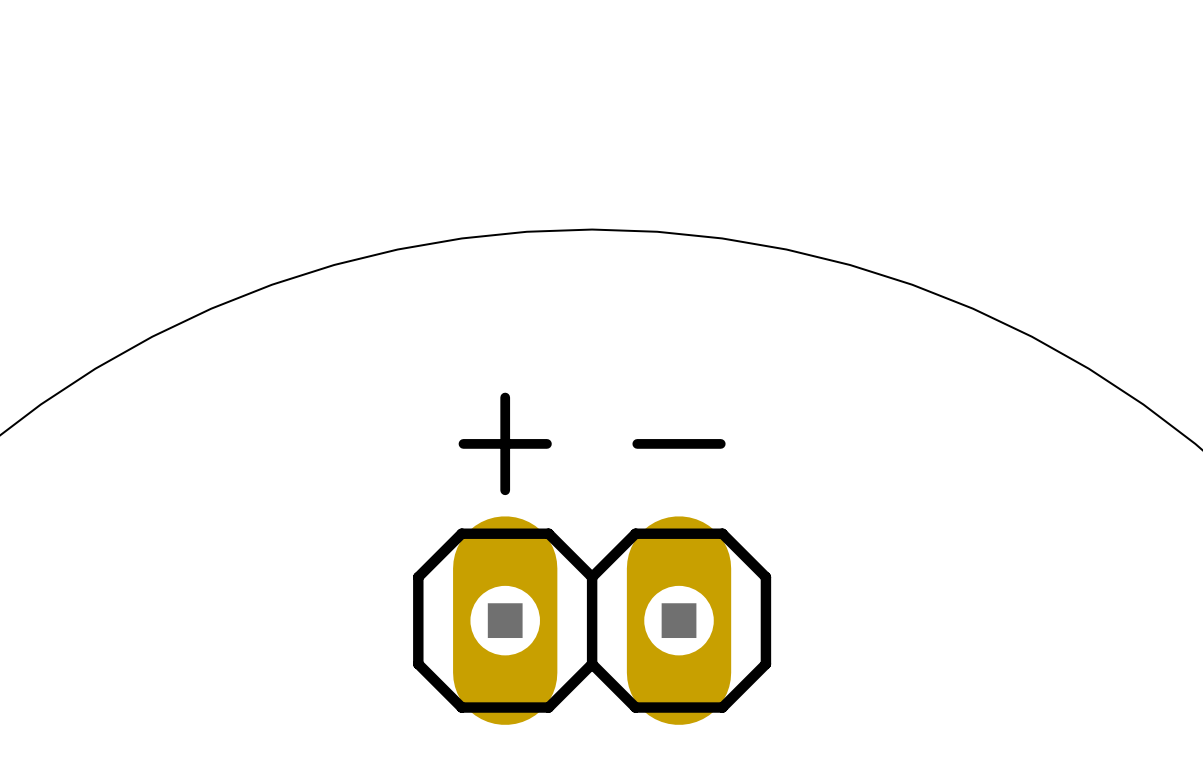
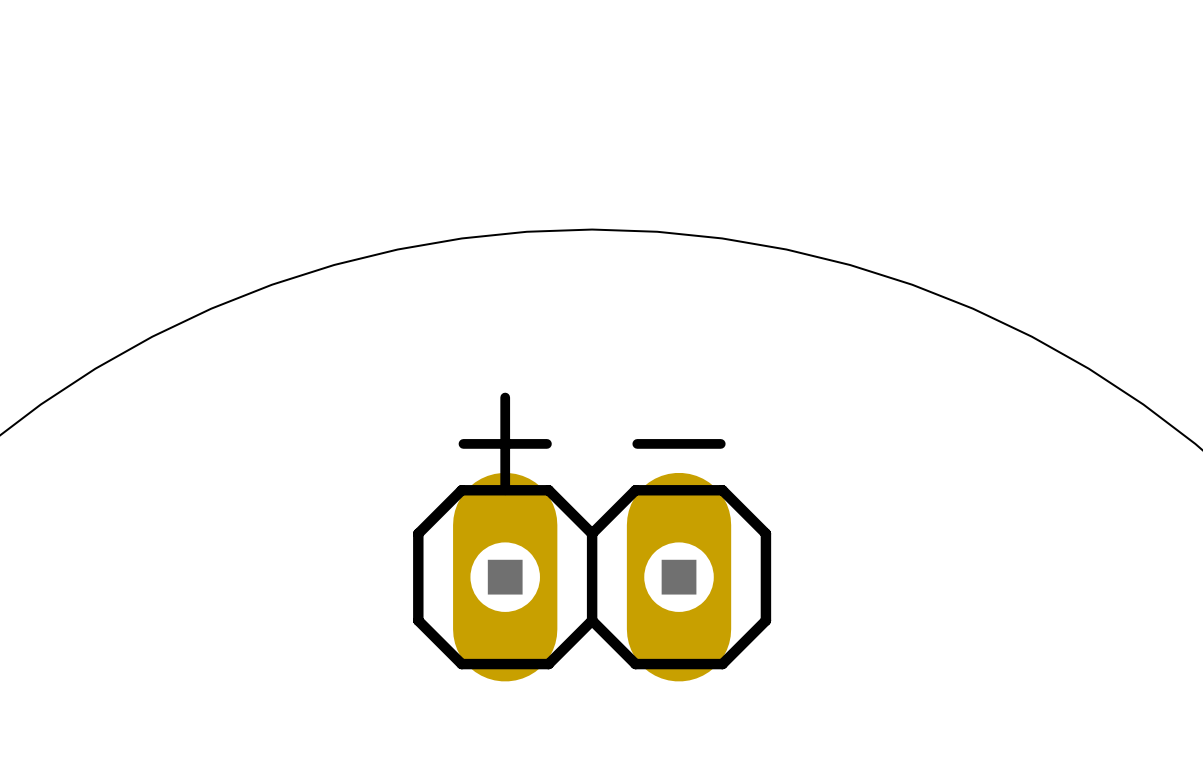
part position: (592, 620) -> (592, 577)

